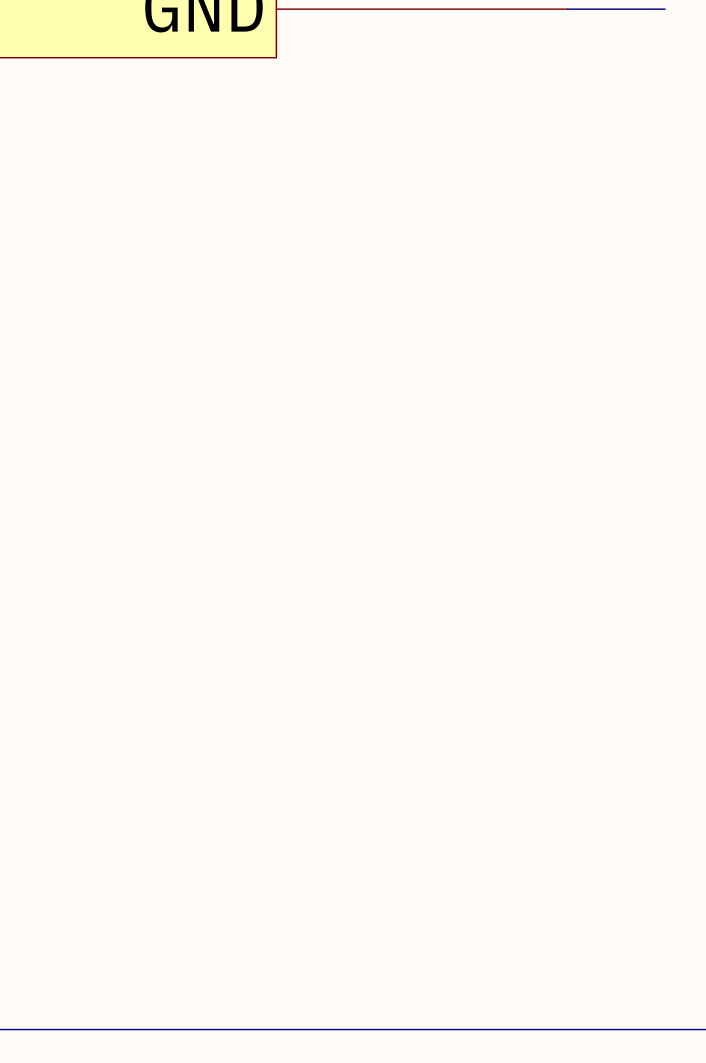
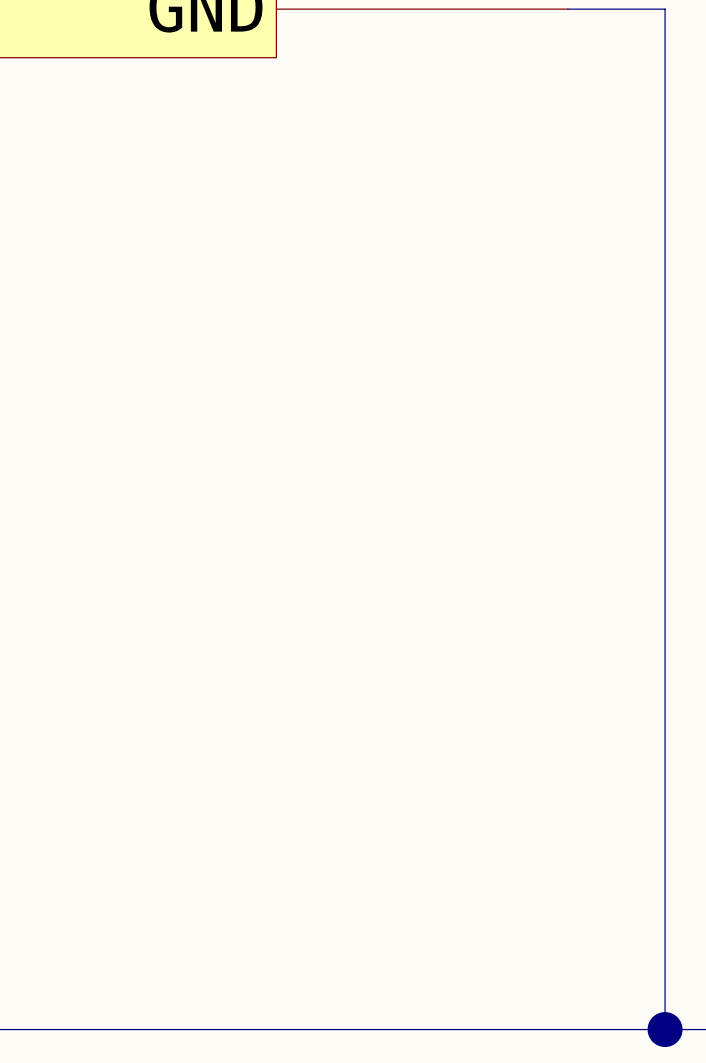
wire: none -> (665, 9) (665, 1029)
junction: none -> (665, 1029)

